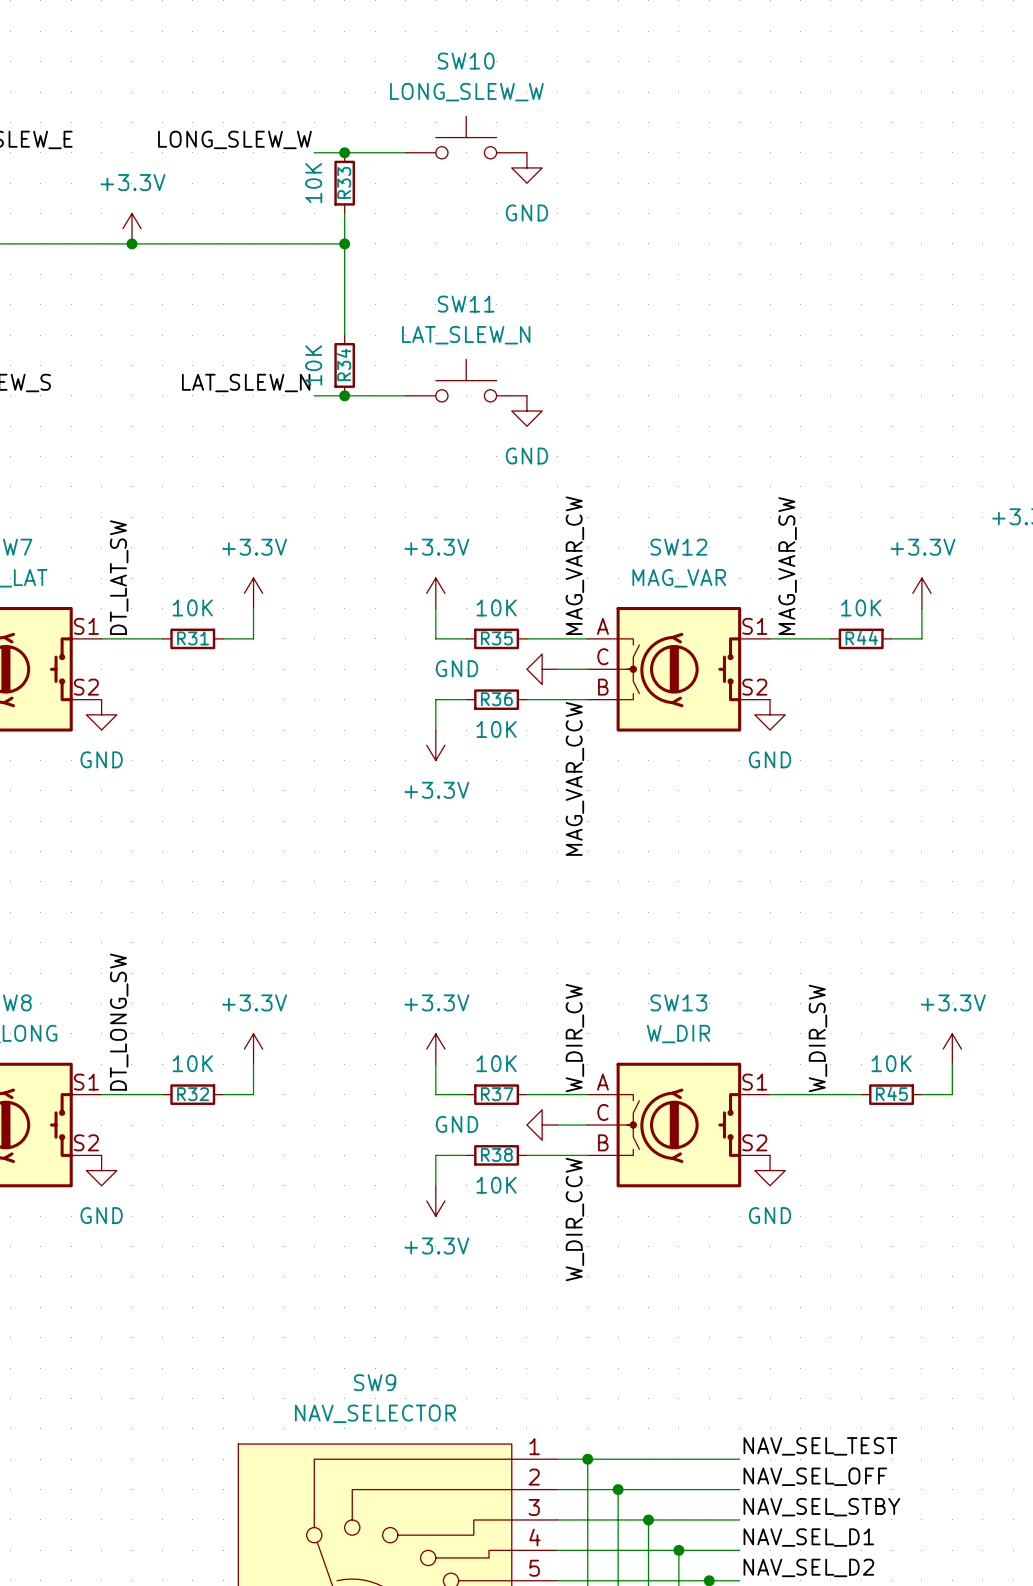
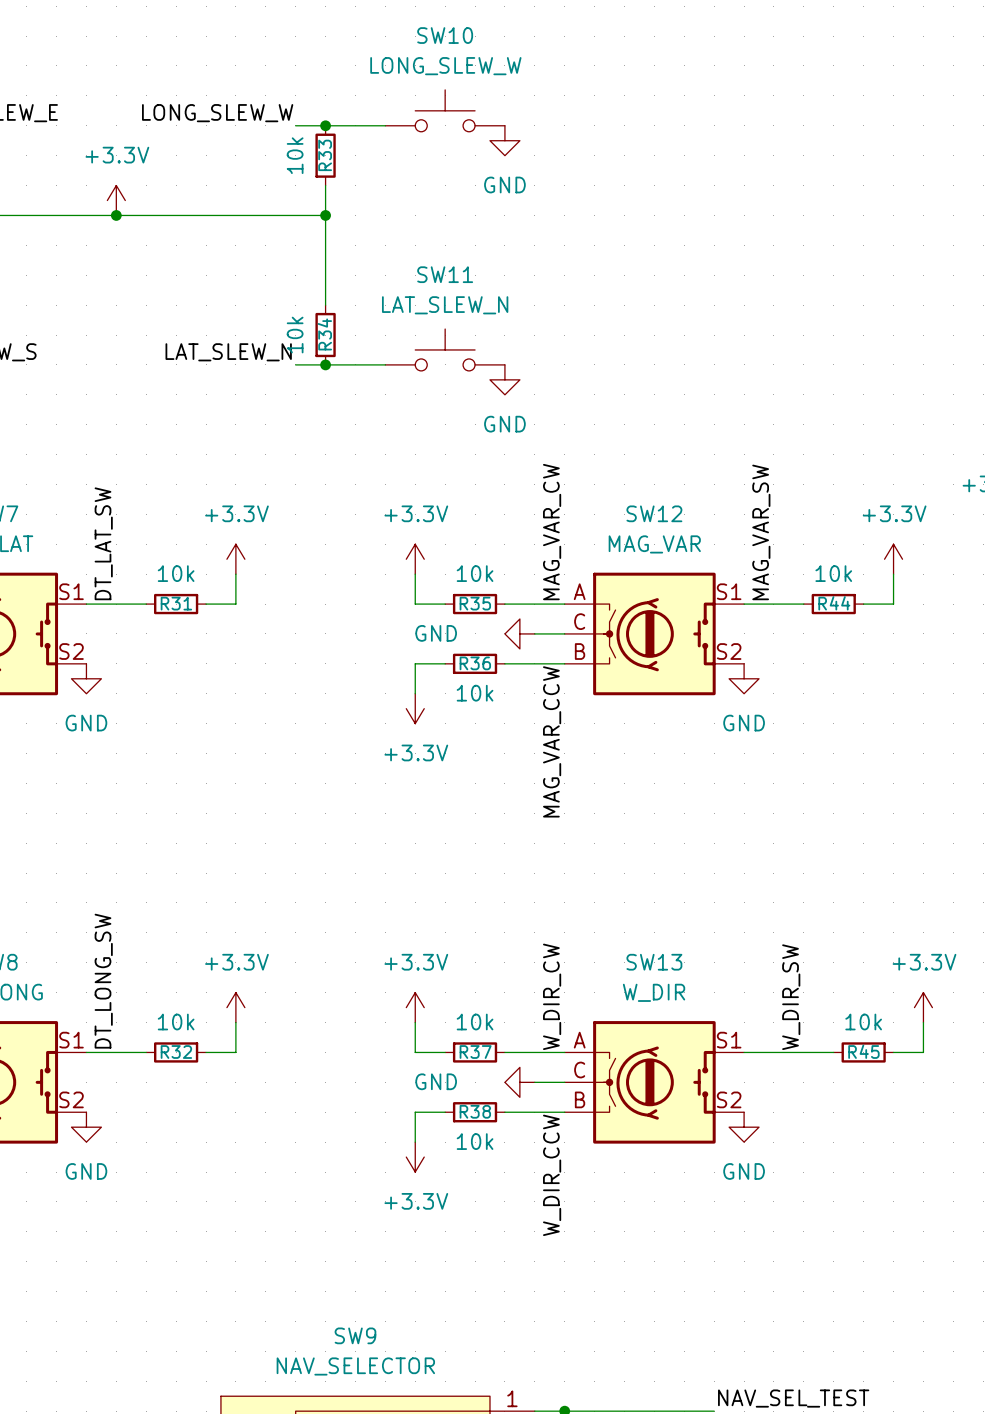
R33 value: 10K (313, 183) -> 10k (295, 155)
R34 value: 10K (313, 365) -> 10k (295, 335)
R31 value: 10K (192, 607) -> 10k (176, 573)
R35 value: 10K (496, 607) -> 10k (475, 573)
R44 value: 10K (861, 607) -> 10k (833, 573)
R36 value: 10K (496, 729) -> 10k (475, 693)
R32 value: 10K (192, 1063) -> 10k (176, 1022)
R37 value: 10K (496, 1063) -> 10k (475, 1022)
R45 value: 10K (891, 1063) -> 10k (863, 1022)
R38 value: 10K (496, 1185) -> 10k (475, 1141)

